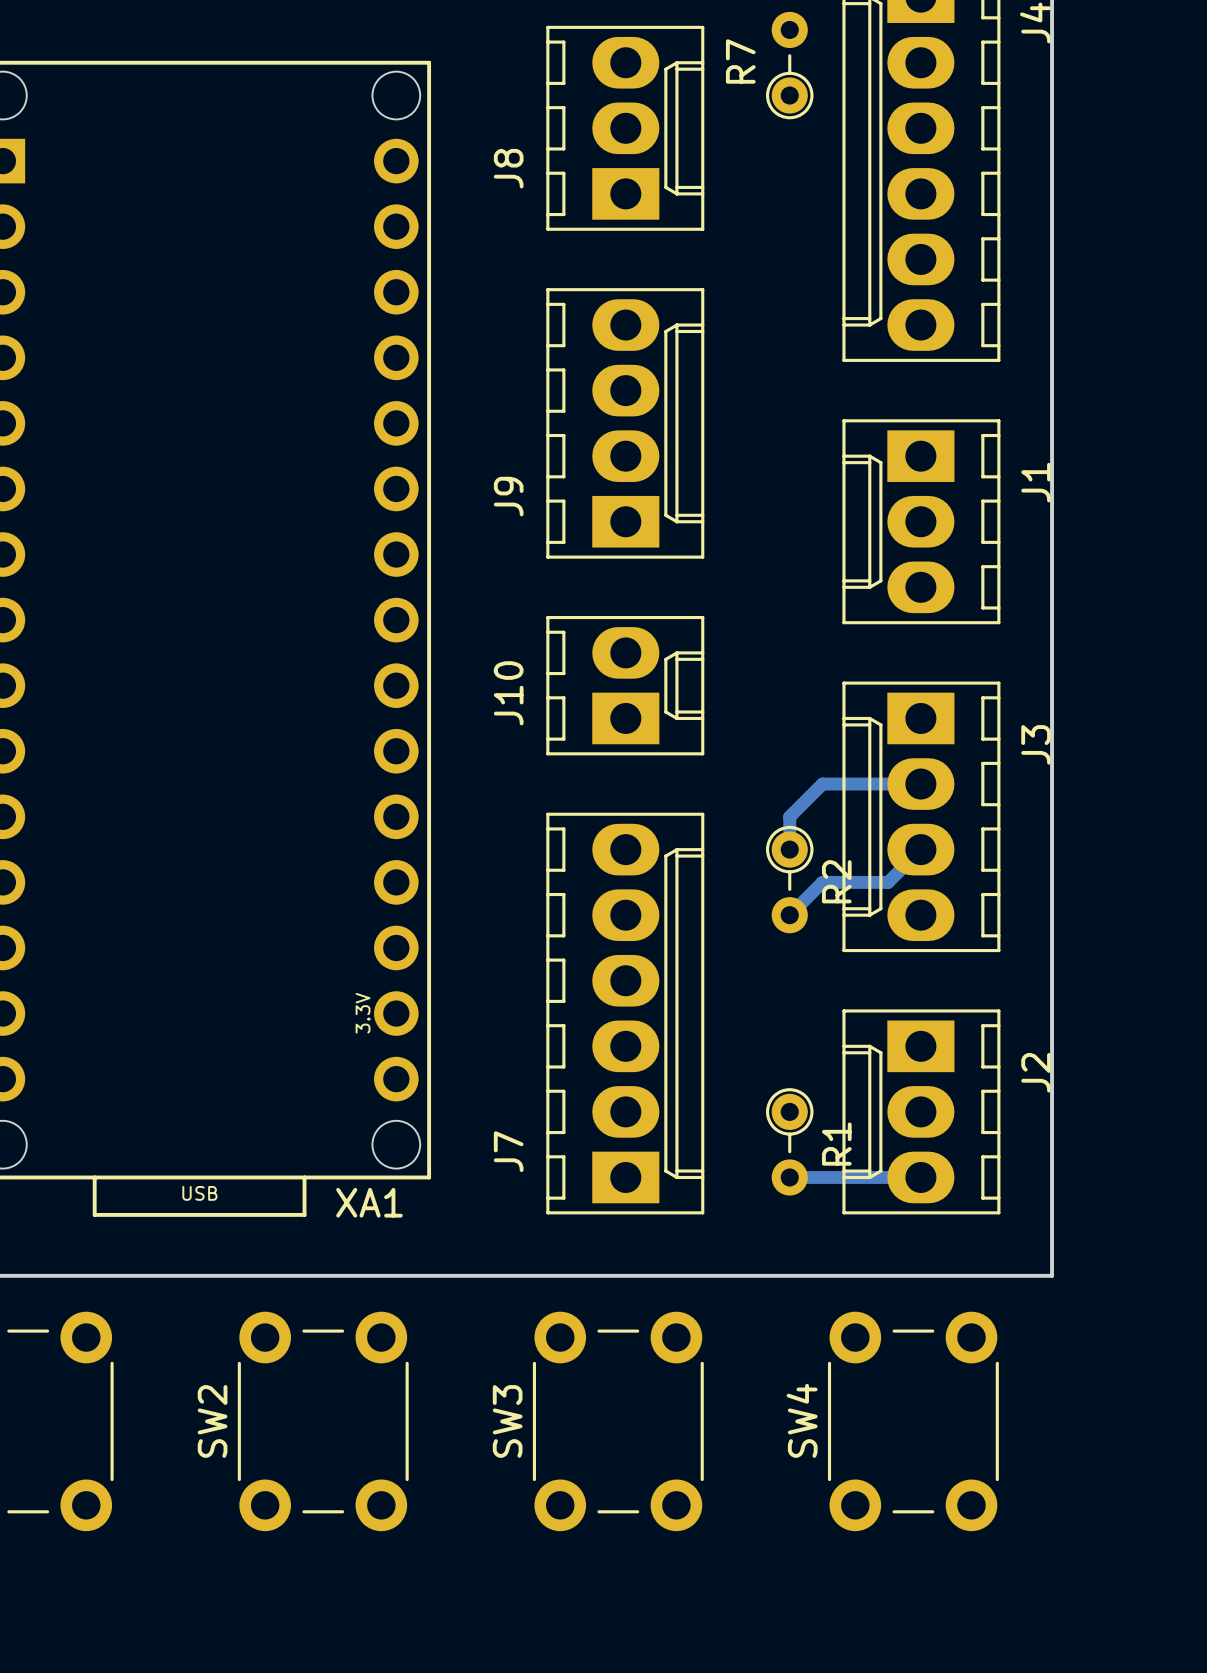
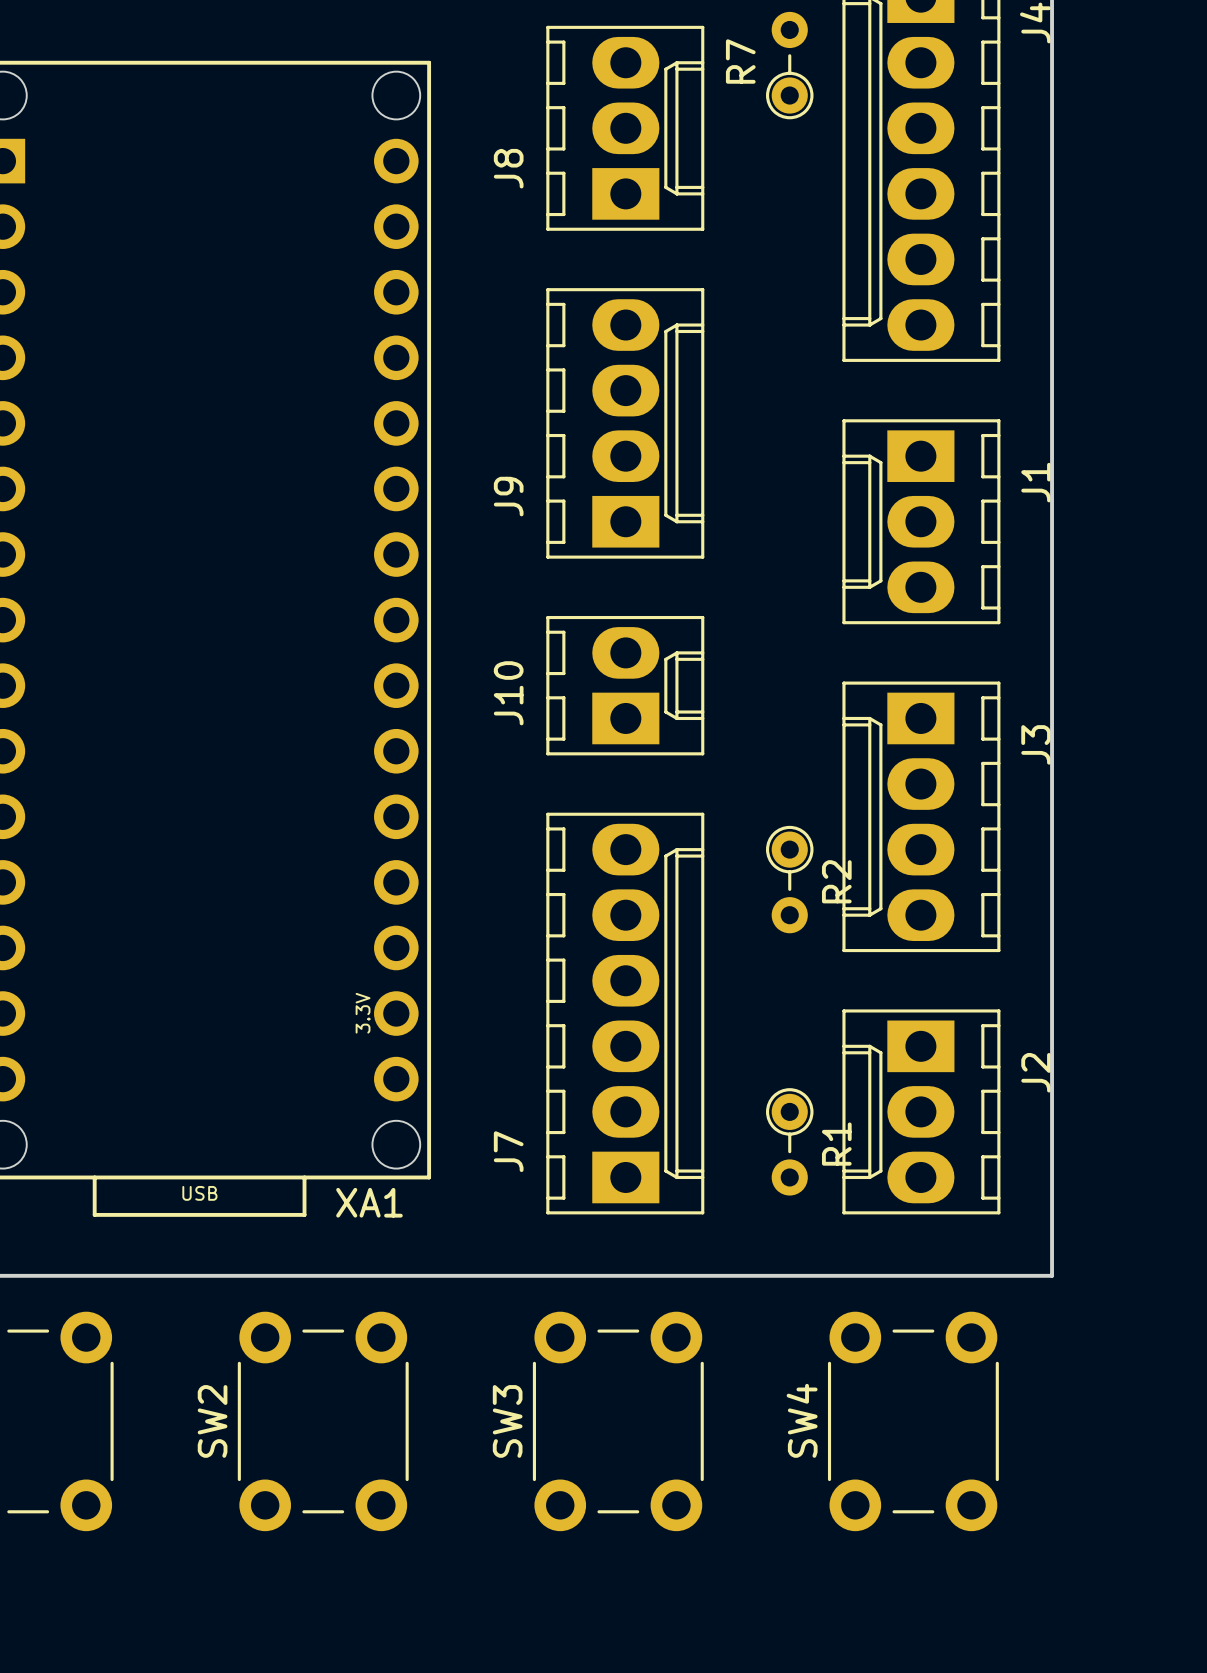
bottom track: (920, 784) (822, 784) (789, 816) (789, 849) -> none
bottom track: (920, 849) (888, 882) (822, 882) (789, 915) -> none
bottom track: (789, 1177) (920, 1177) -> none

